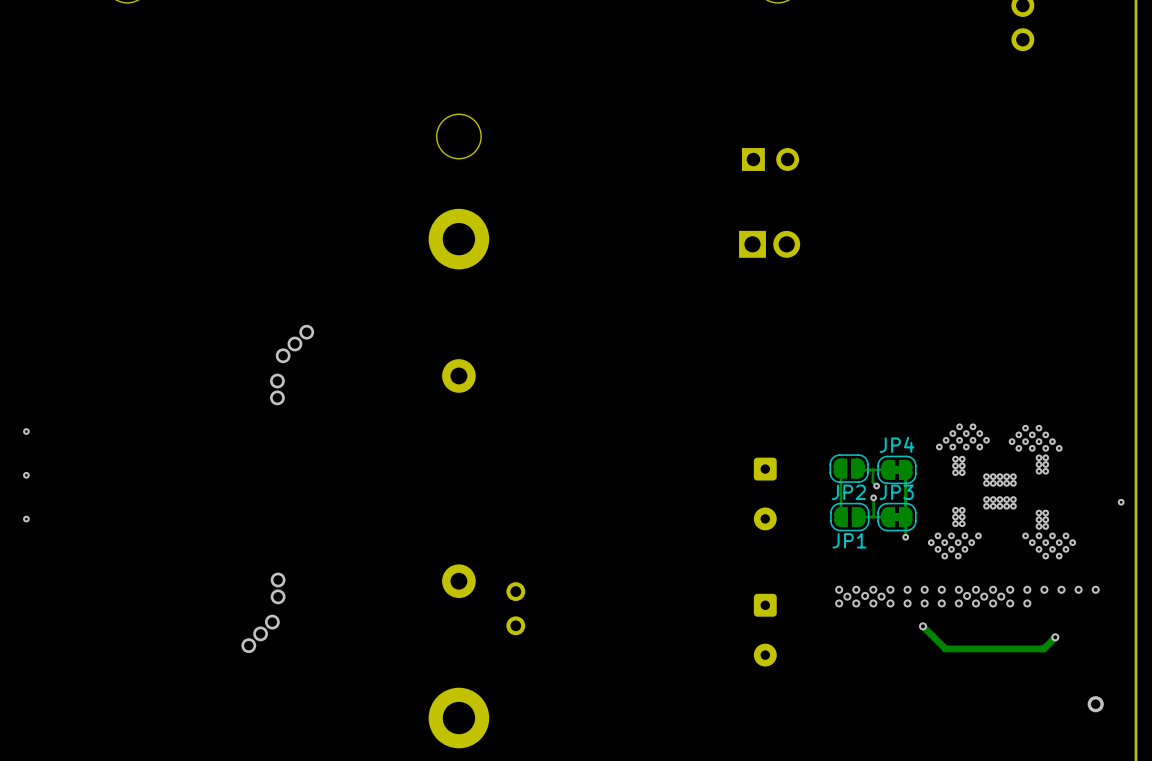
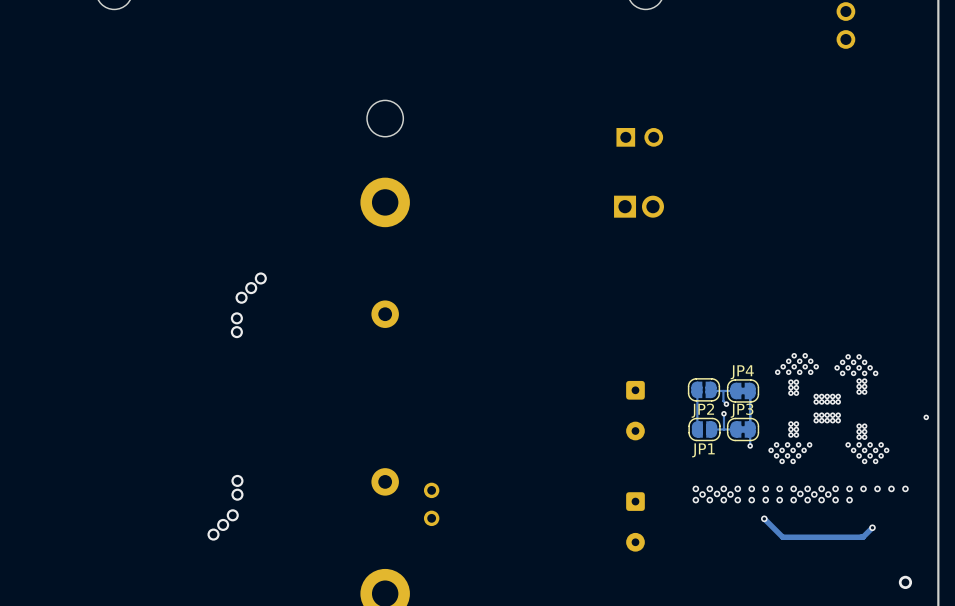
via: (26, 431) -> none
via: (26, 475) -> none
via: (26, 519) -> none

